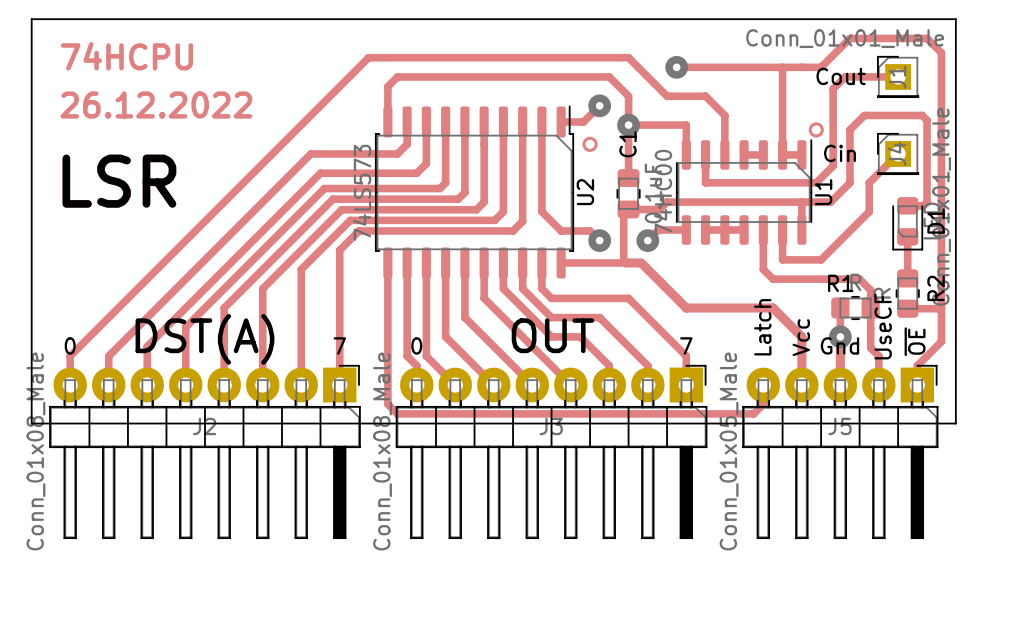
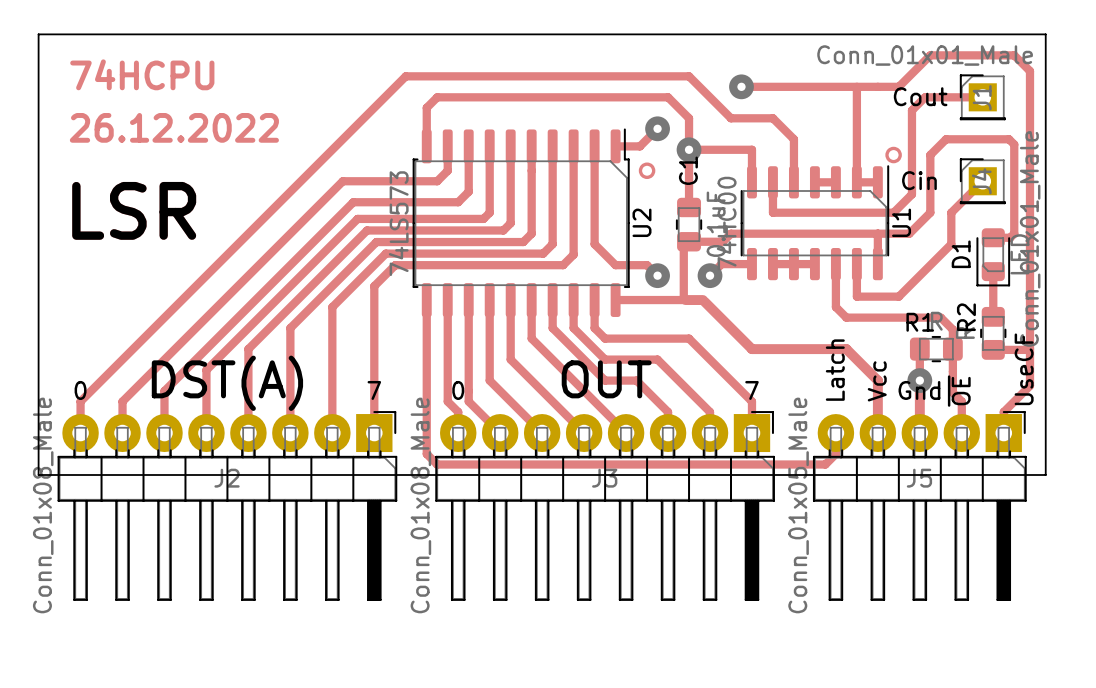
D1 name position: D1 (936, 221) -> D1 (961, 254)
R2 name position: R2 (936, 288) -> R2 (966, 317)
text position: UseCF (883, 326) -> UseCF (1024, 369)
text position: ~{OE} (915, 341) -> ~{OE} (959, 391)

